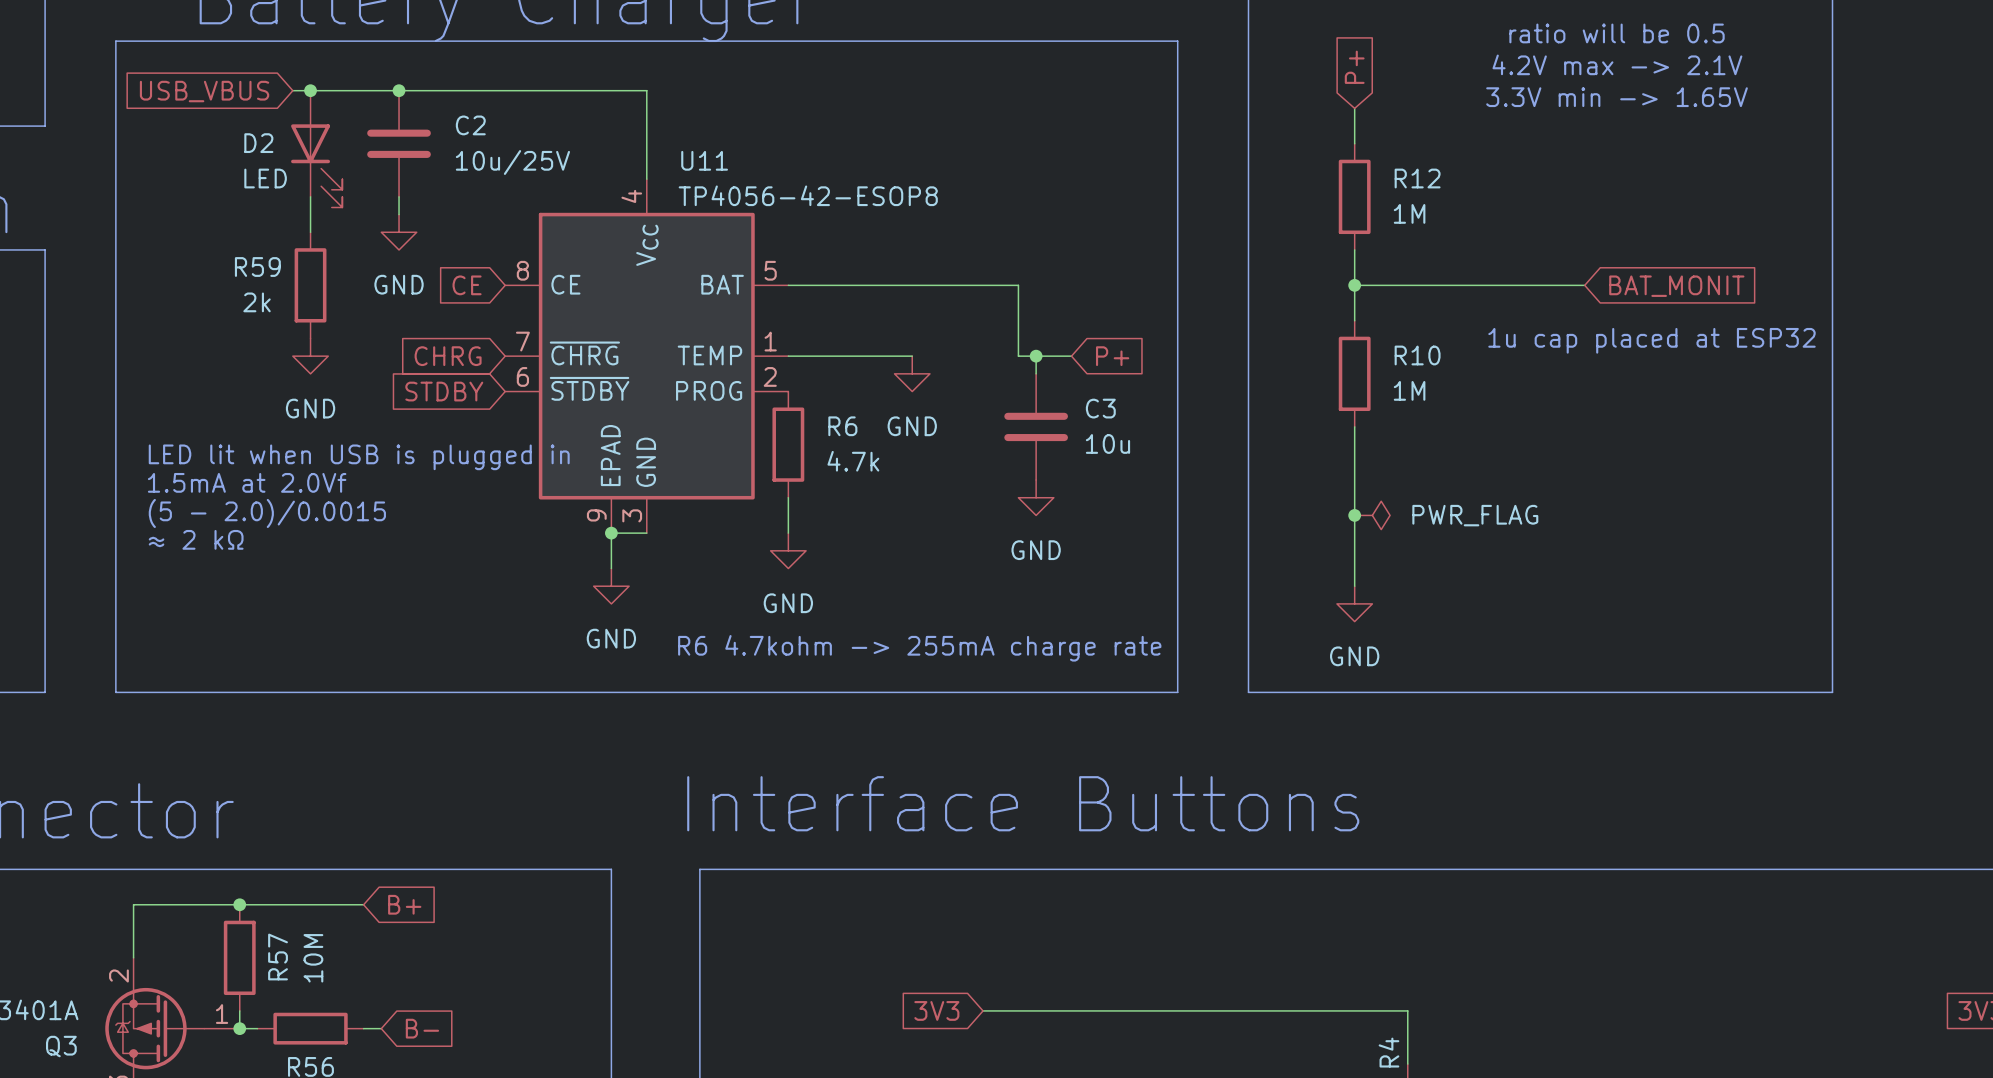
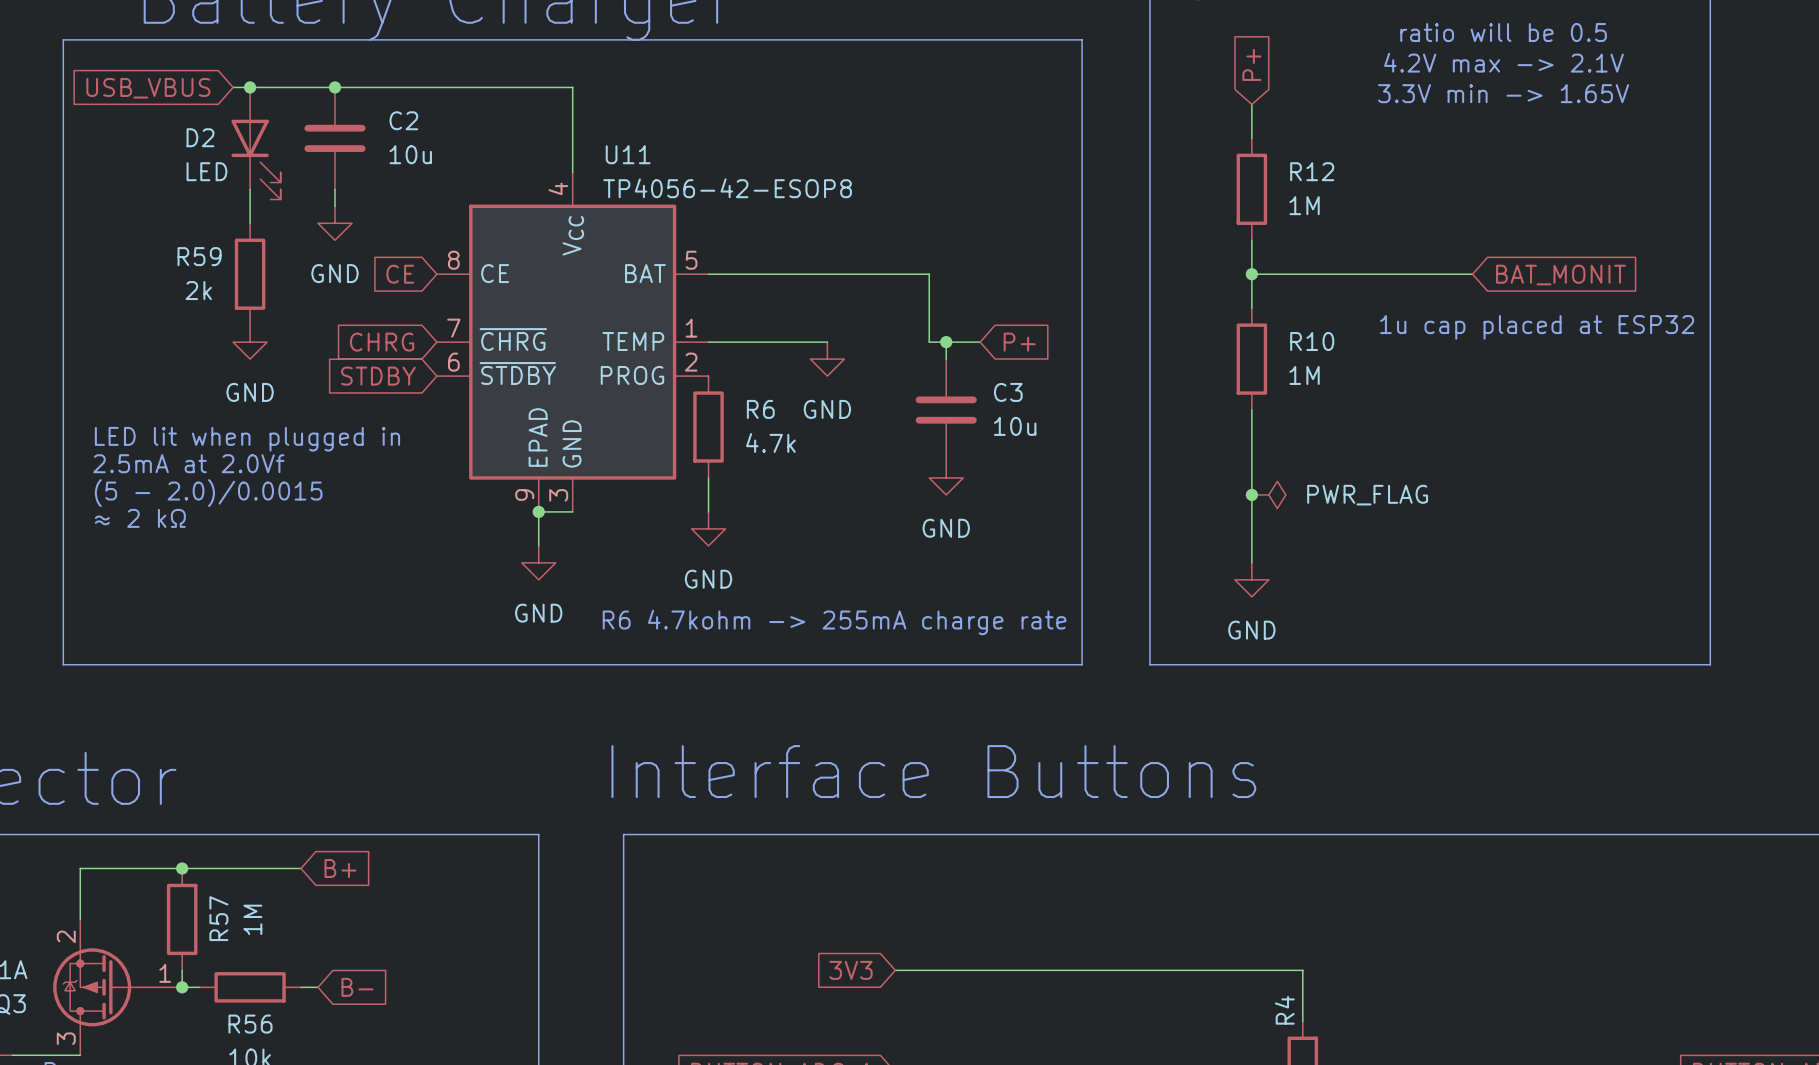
C2 value: 10u/25V (512, 162) -> 10u (410, 154)
text: LED lit when USB is plugged in (359, 457) -> LED lit when plugged in (247, 439)
text: 1.5mA at 2.0Vf (247, 482) -> 2.5mA at 2.0Vf (188, 463)
R57 value: 10M (313, 958) -> 1M (252, 919)

